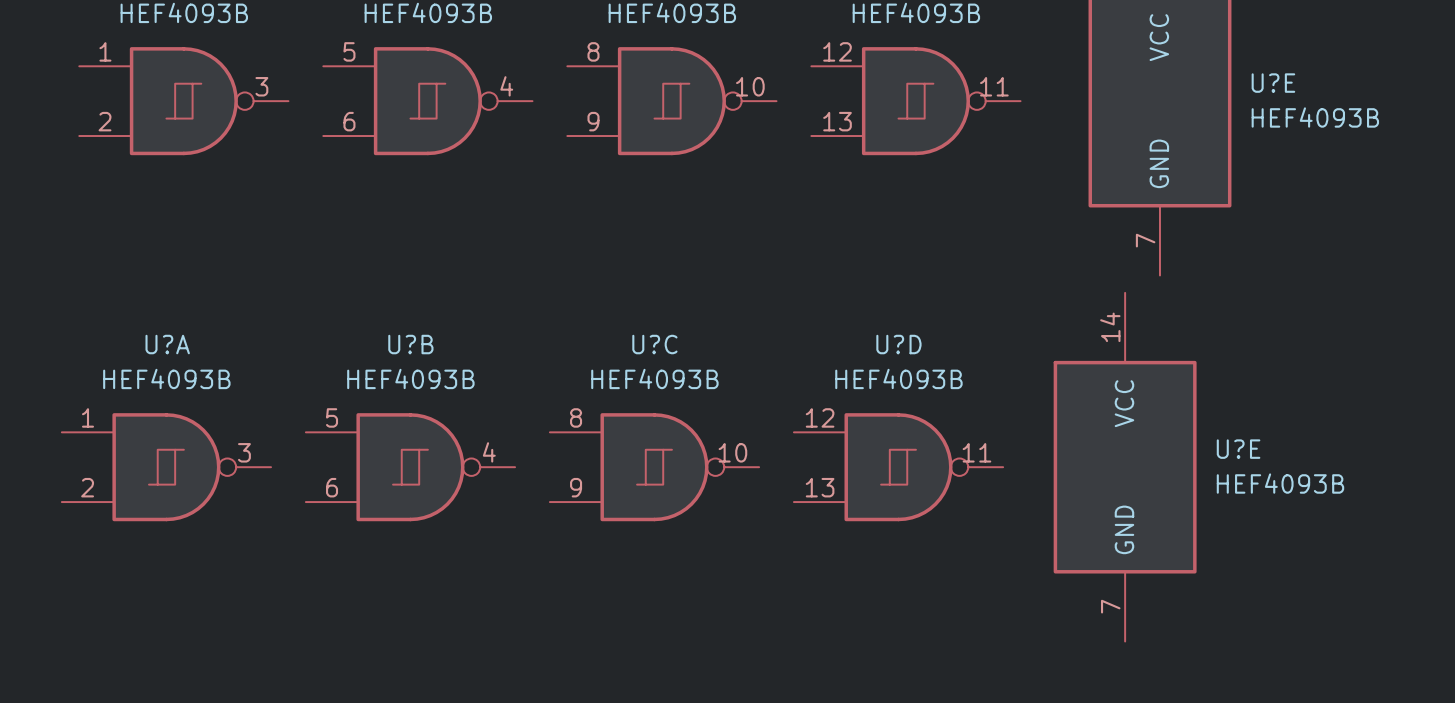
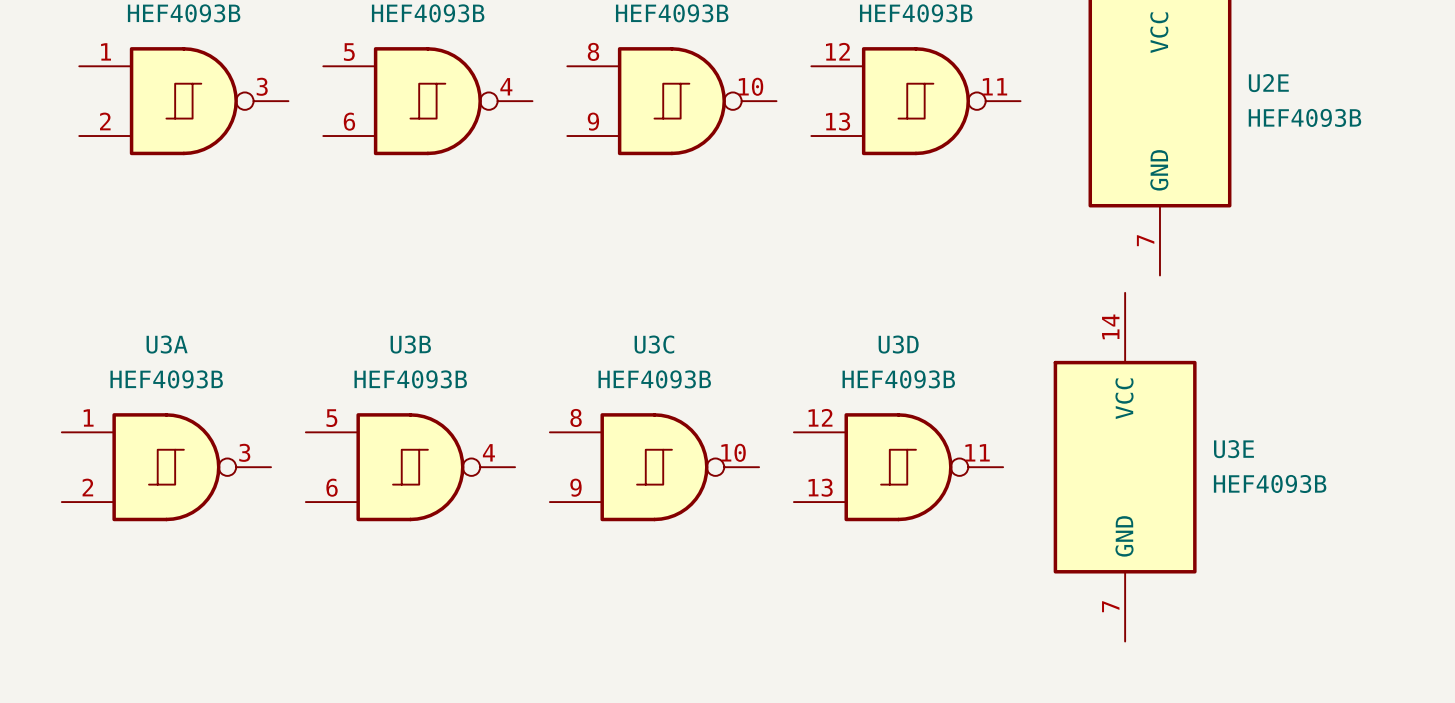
U?E name: U?E (1273, 83) -> U2E (1268, 83)
U?A name: U?A (167, 344) -> U3A (167, 344)
U?B name: U?B (410, 344) -> U3B (410, 344)
U?C name: U?C (654, 344) -> U3C (654, 344)
U?D name: U?D (898, 344) -> U3D (898, 344)
U?E name: U?E (1238, 449) -> U3E (1233, 449)

